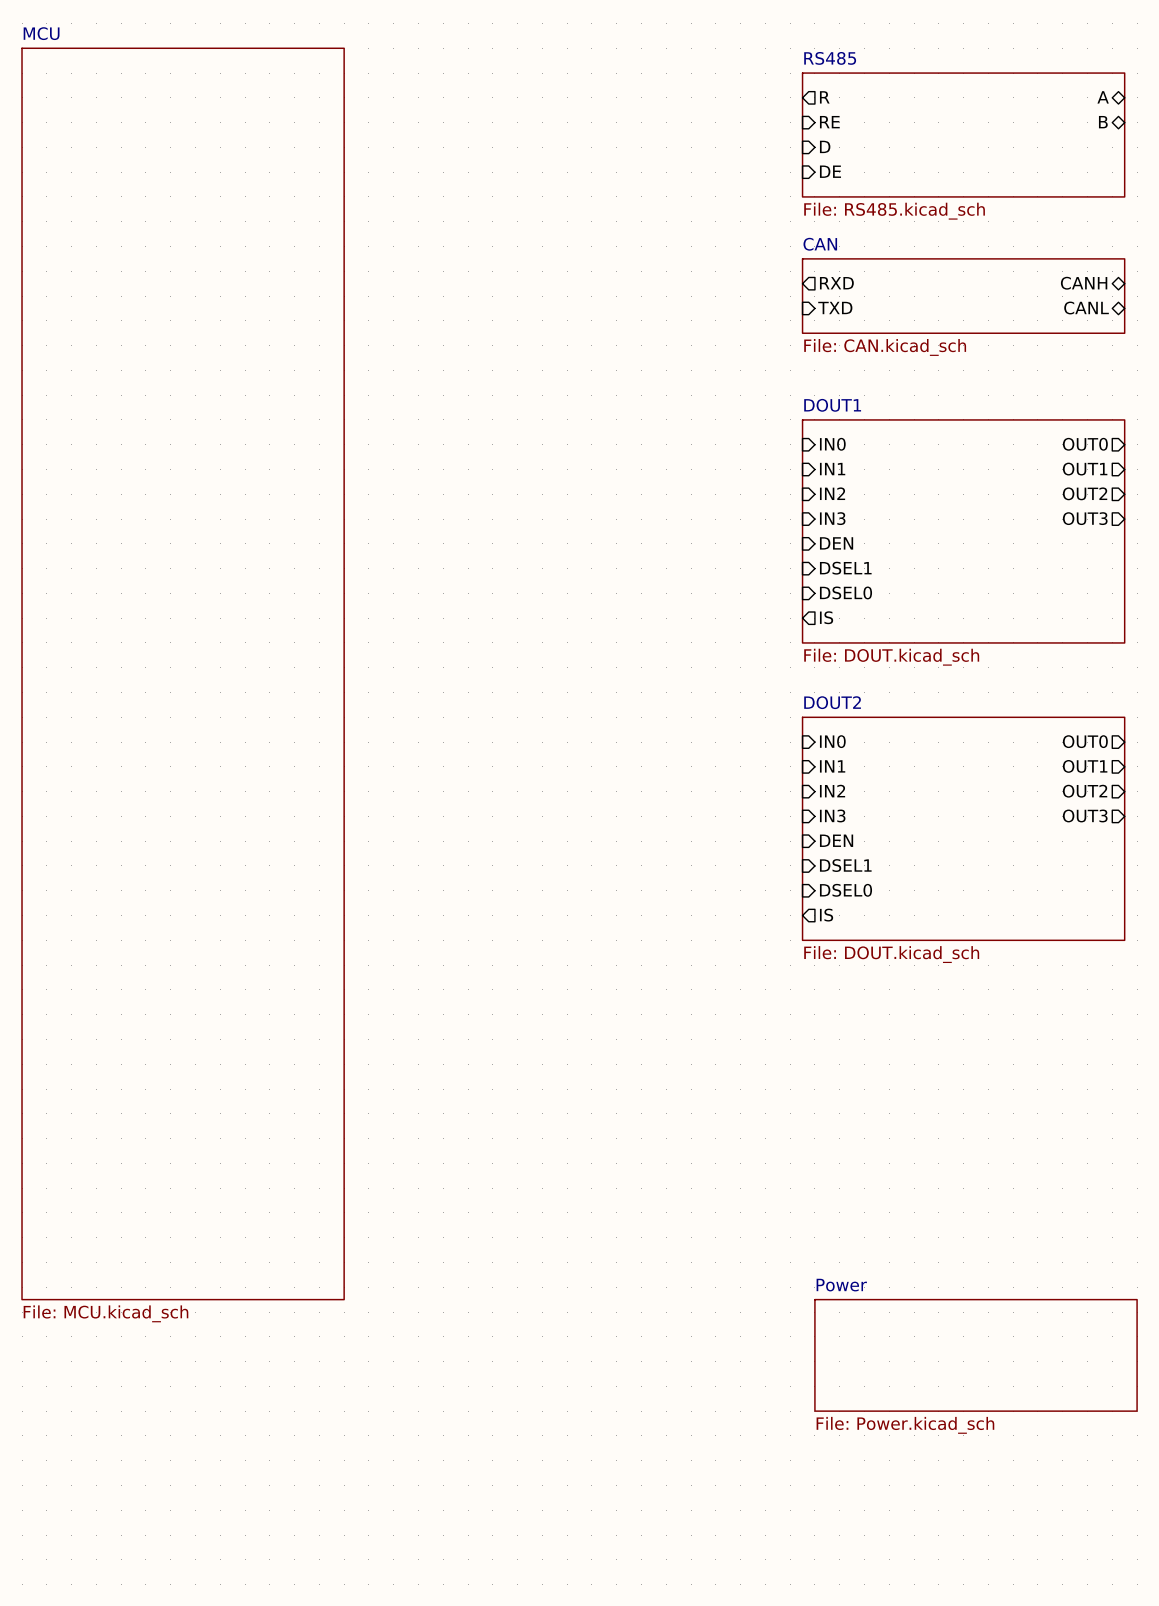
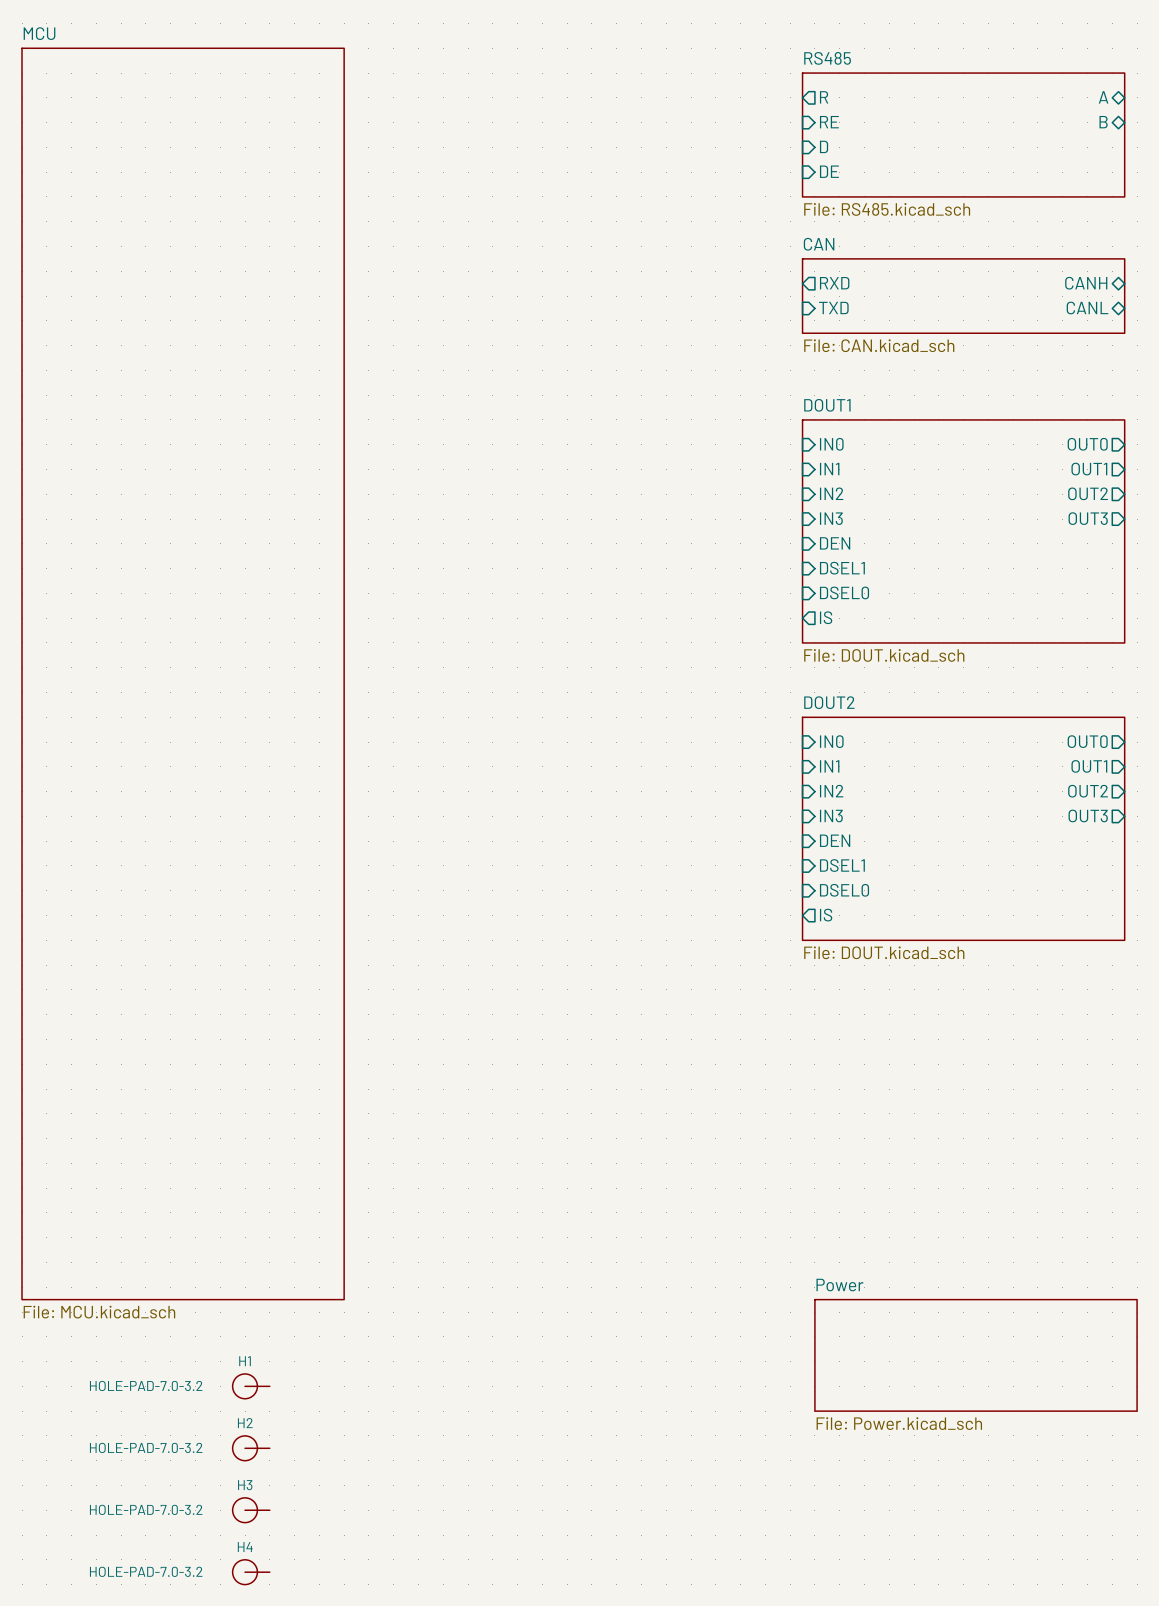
H1: none -> HOLE-PAD-7.0-3.2 (251, 1386)
H2: none -> HOLE-PAD-7.0-3.2 (251, 1448)
H3: none -> HOLE-PAD-7.0-3.2 (251, 1510)
H4: none -> HOLE-PAD-7.0-3.2 (251, 1572)

